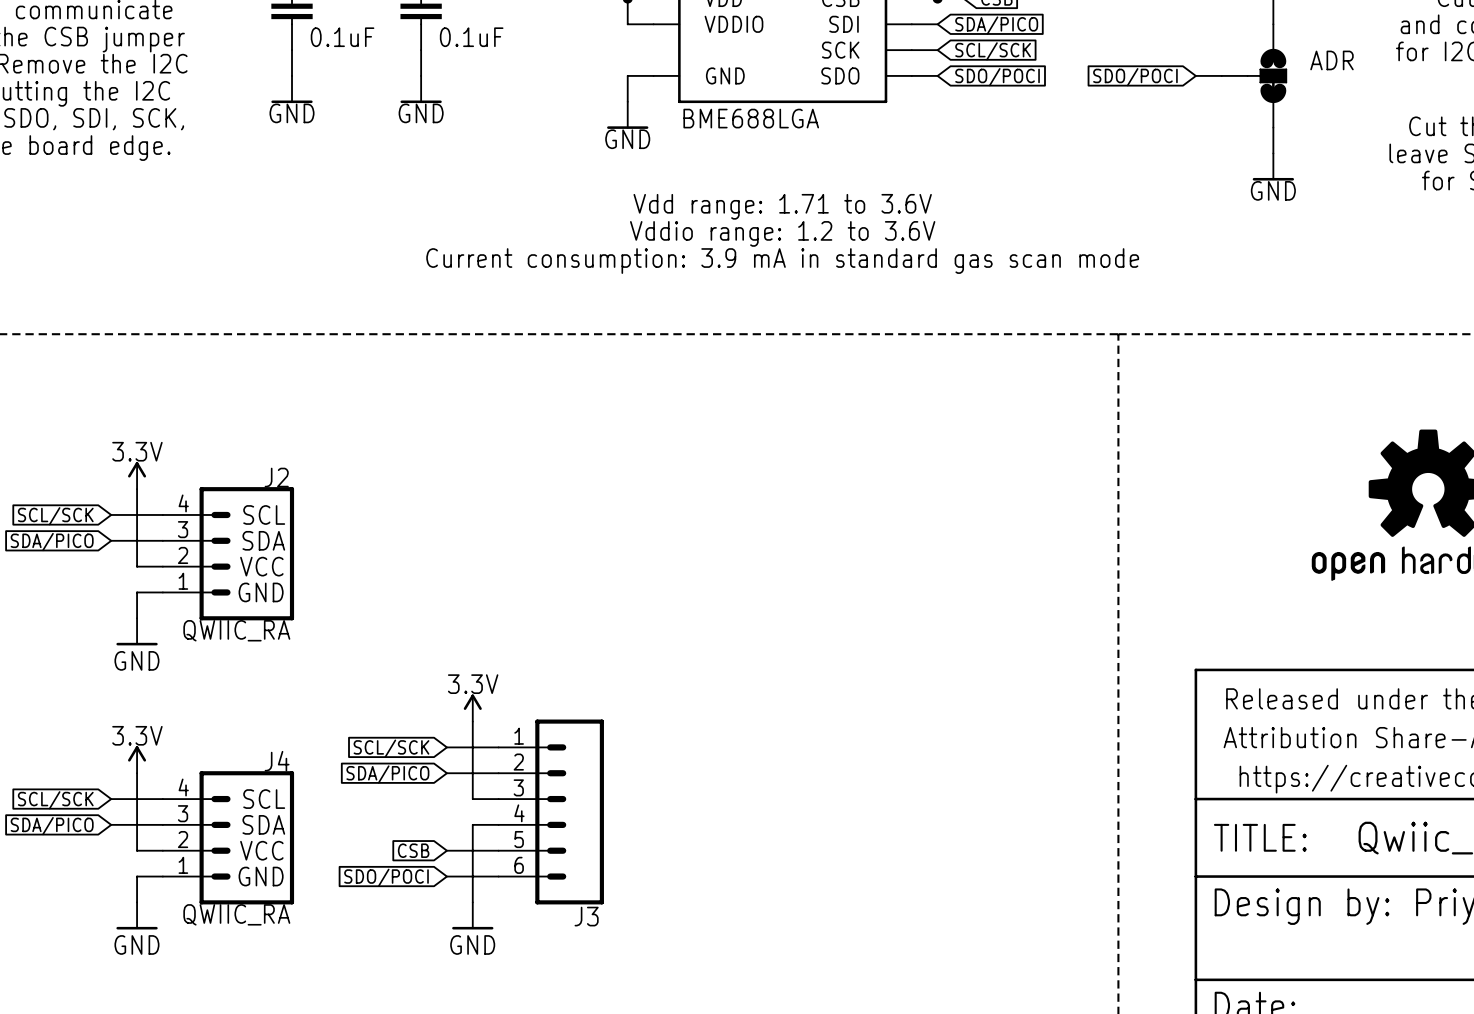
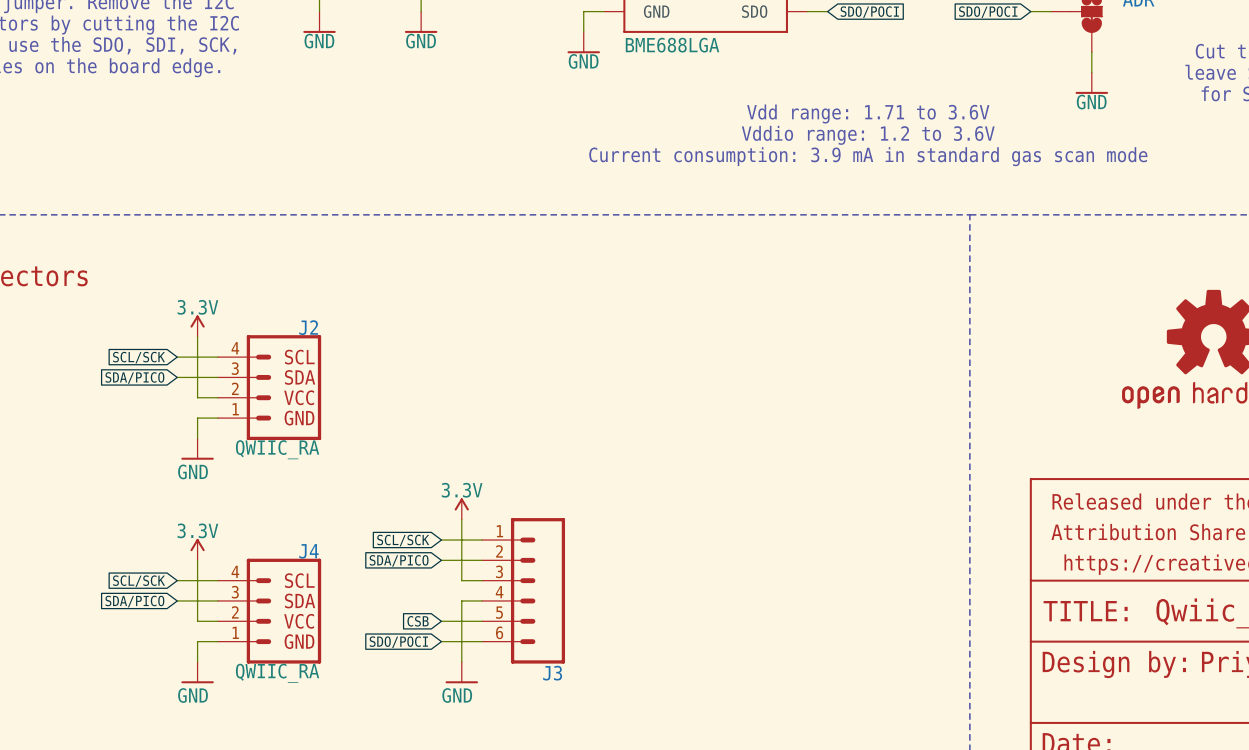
text position: Vdd range: 1.71 to 3.6V (782, 206) -> Vdd range: 1.71 to 3.6V (868, 114)
text position: Vddio range: 1.2 to 3.6V (782, 233) -> Vddio range: 1.2 to 3.6V (868, 135)
text position: Current consumption: 3.9 mA in standard gas scan mode (782, 261) -> Current consumption: 3.9 mA in standard gas scan mode (868, 156)

